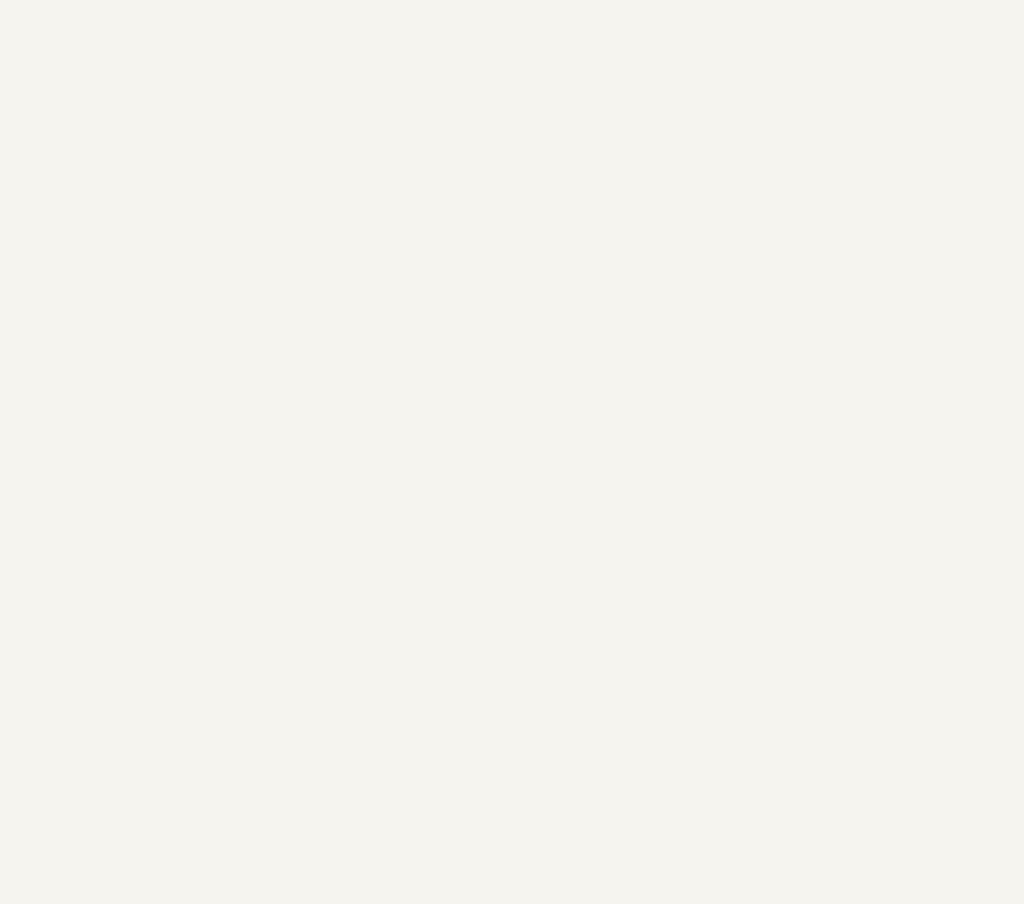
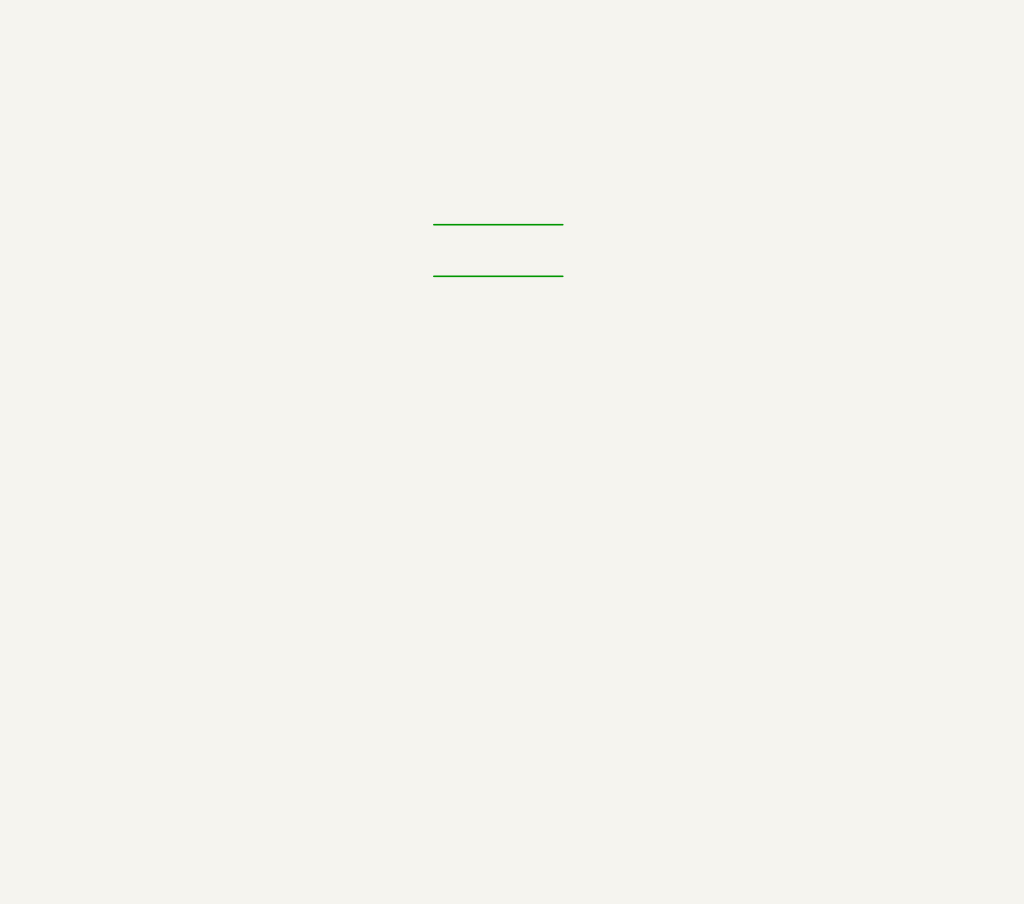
wire: none -> (433, 224) (562, 224)
wire: none -> (433, 276) (562, 276)

